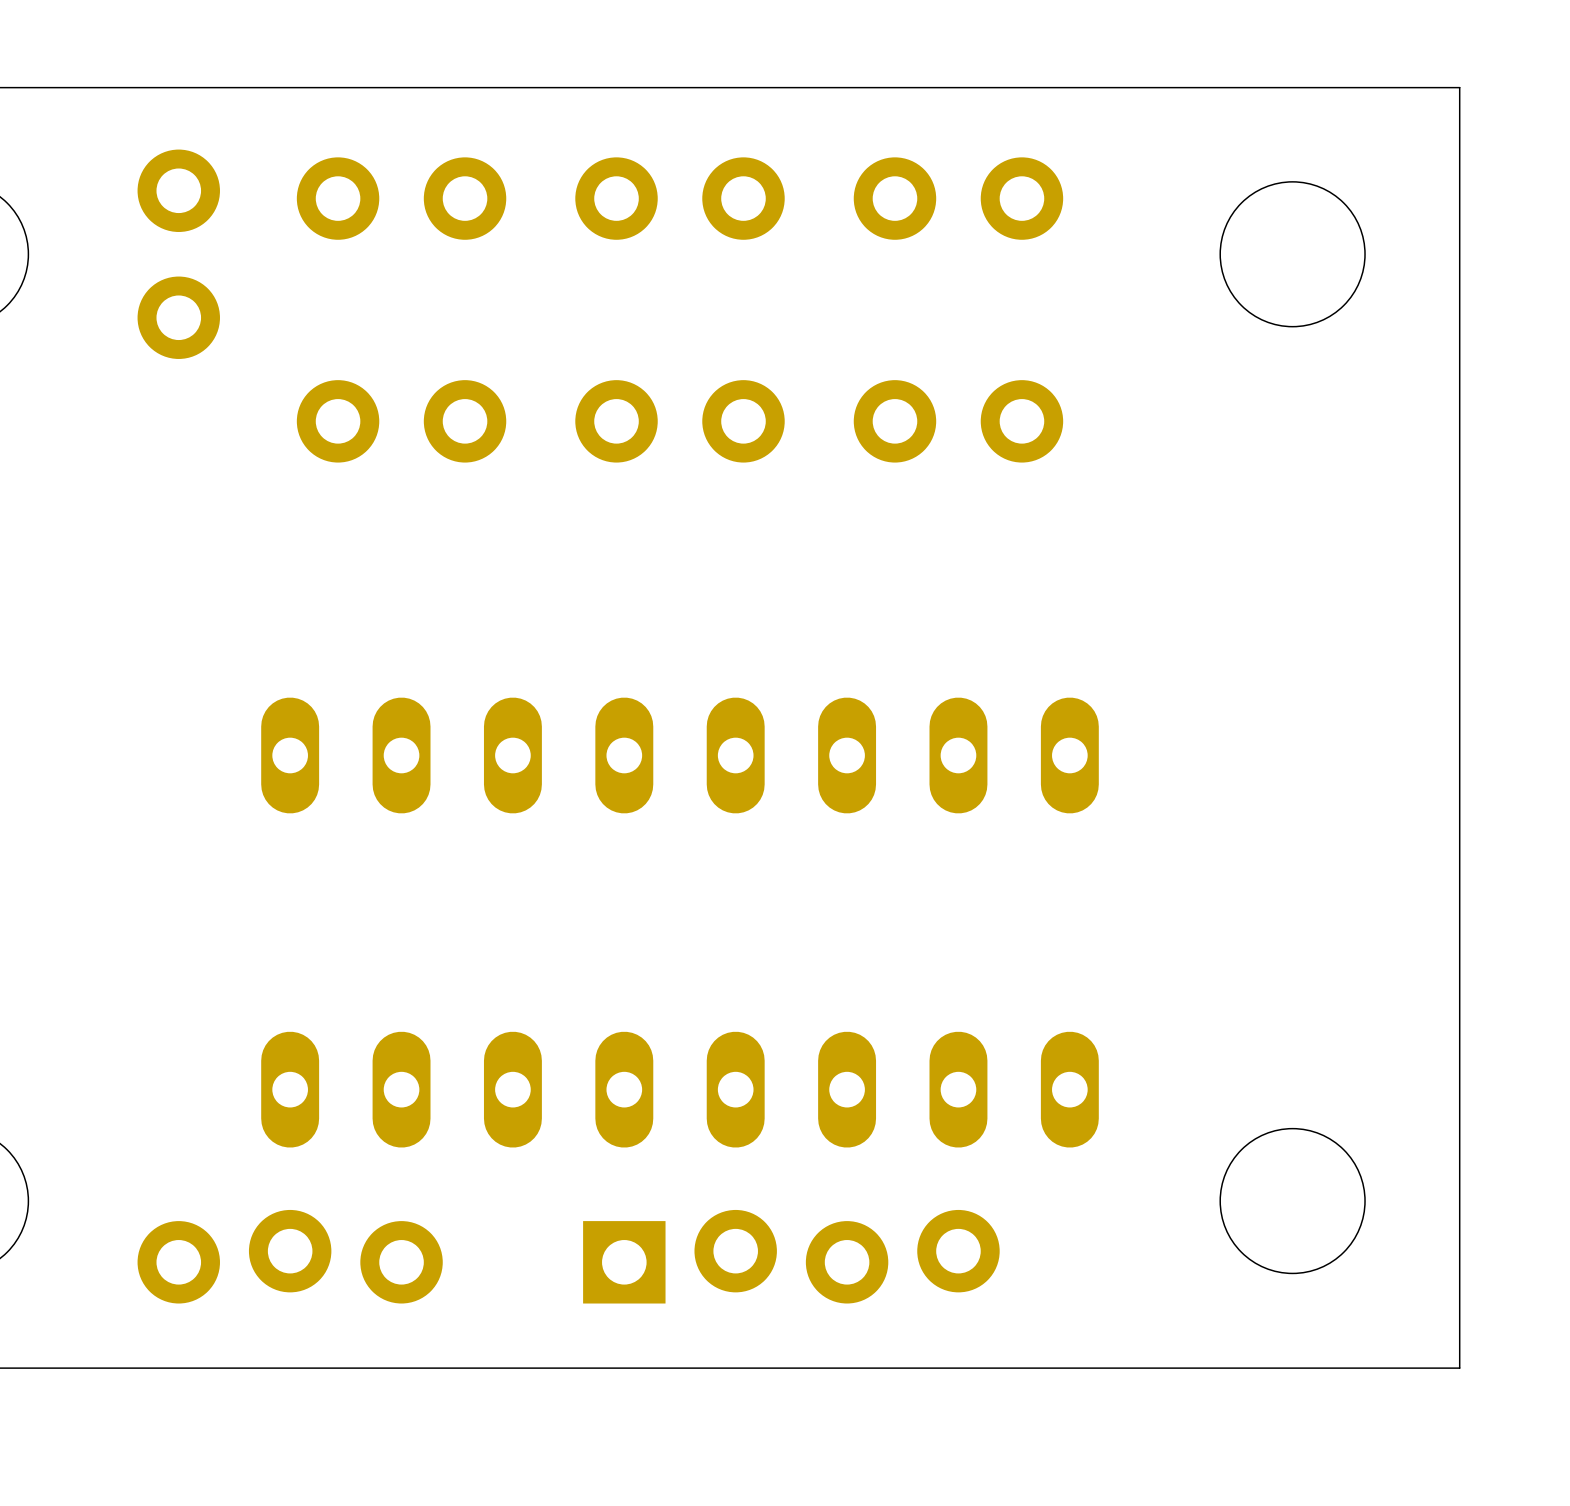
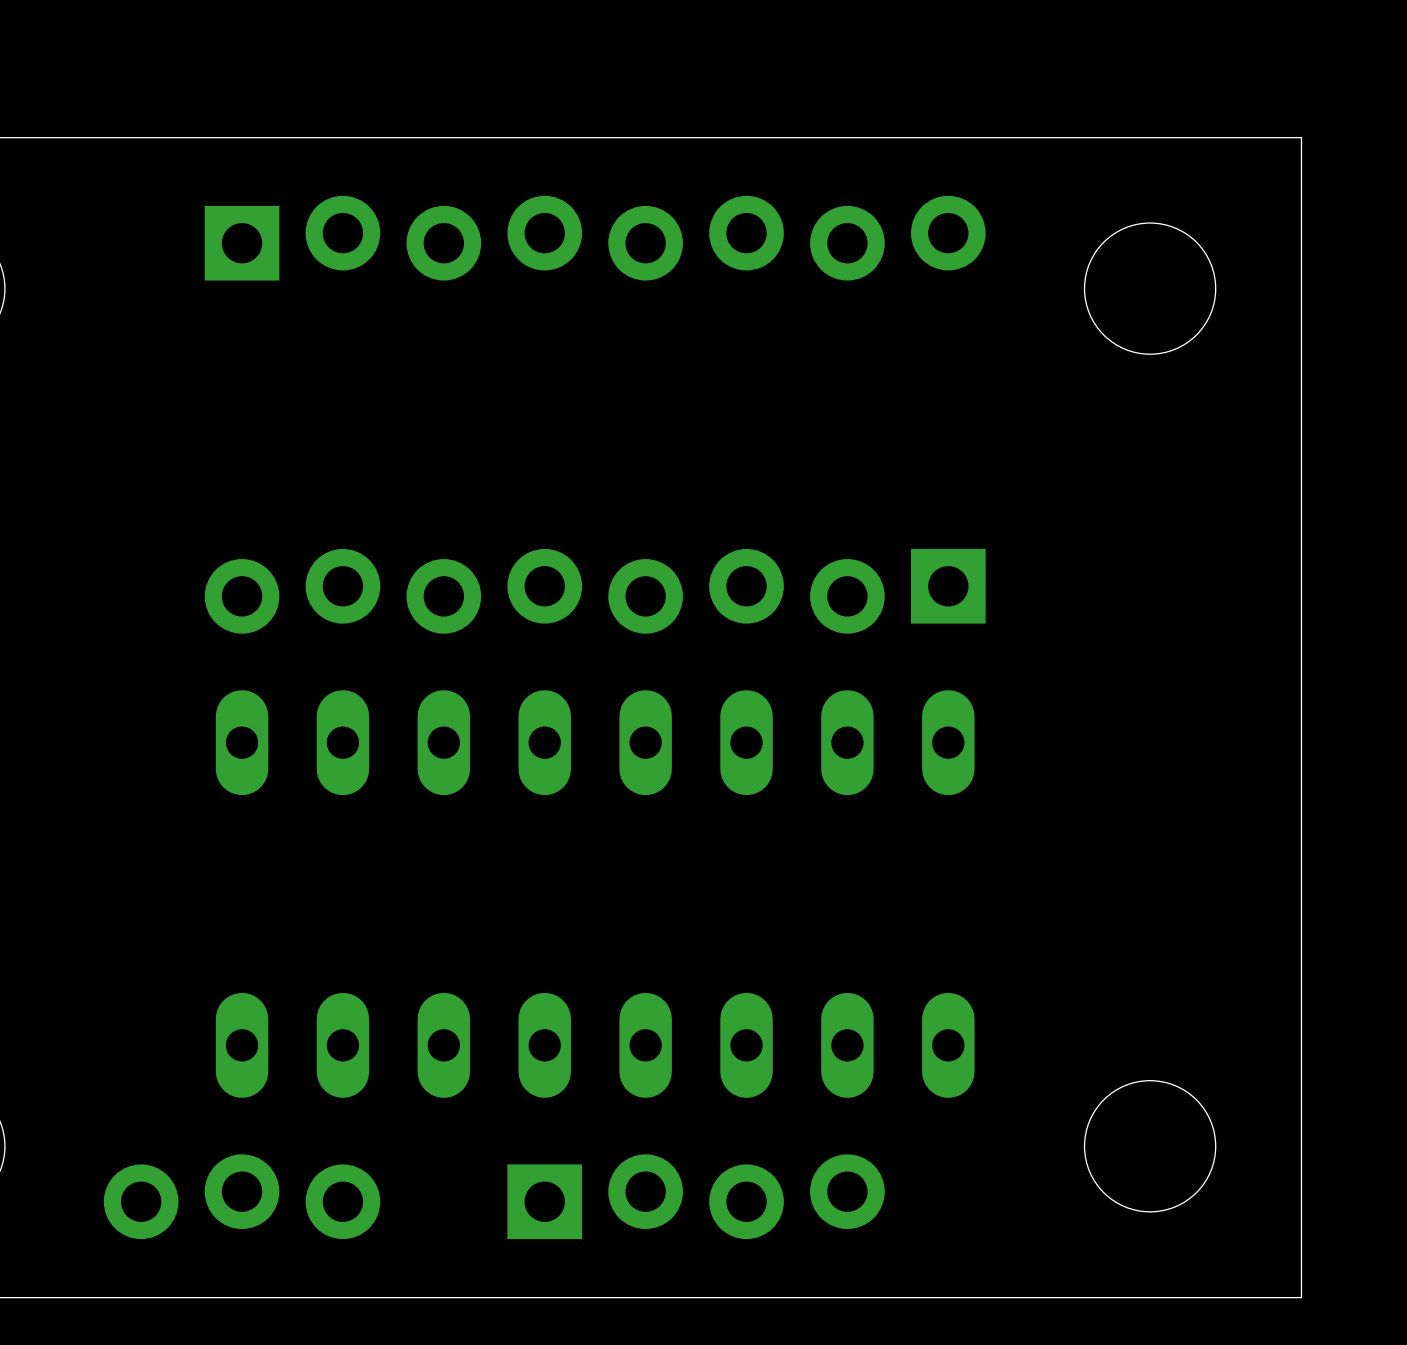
part footprint: [575, 157, 785, 240] -> [204, 195, 986, 281]
part: (401, 198) -> none
part: (958, 198) -> none
part: (178, 254) -> none
part: (401, 421) -> none
part: (680, 421) -> none
part: (958, 421) -> none
part: none -> (595, 591)

